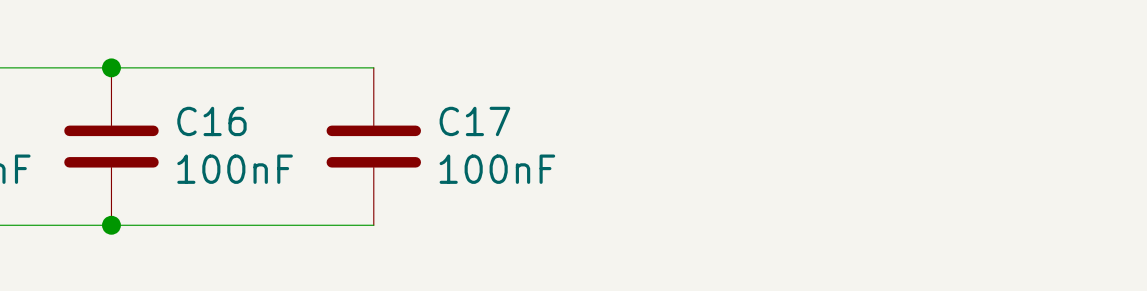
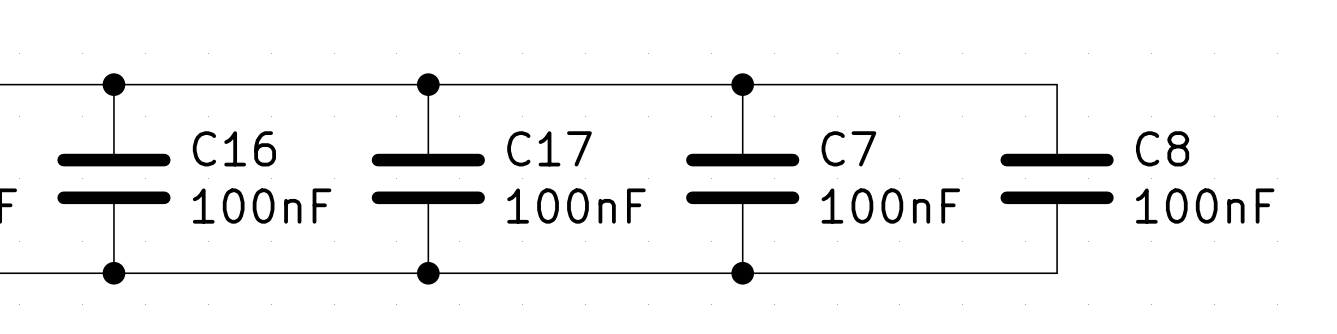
wire: none -> (428, 84) (1057, 84)
junction: none -> (428, 84)
junction: none -> (742, 84)
C7: none -> 100nF (742, 178)
C8: none -> 100nF (1057, 178)
wire: none -> (428, 273) (1057, 273)
junction: none -> (428, 273)
junction: none -> (742, 273)

